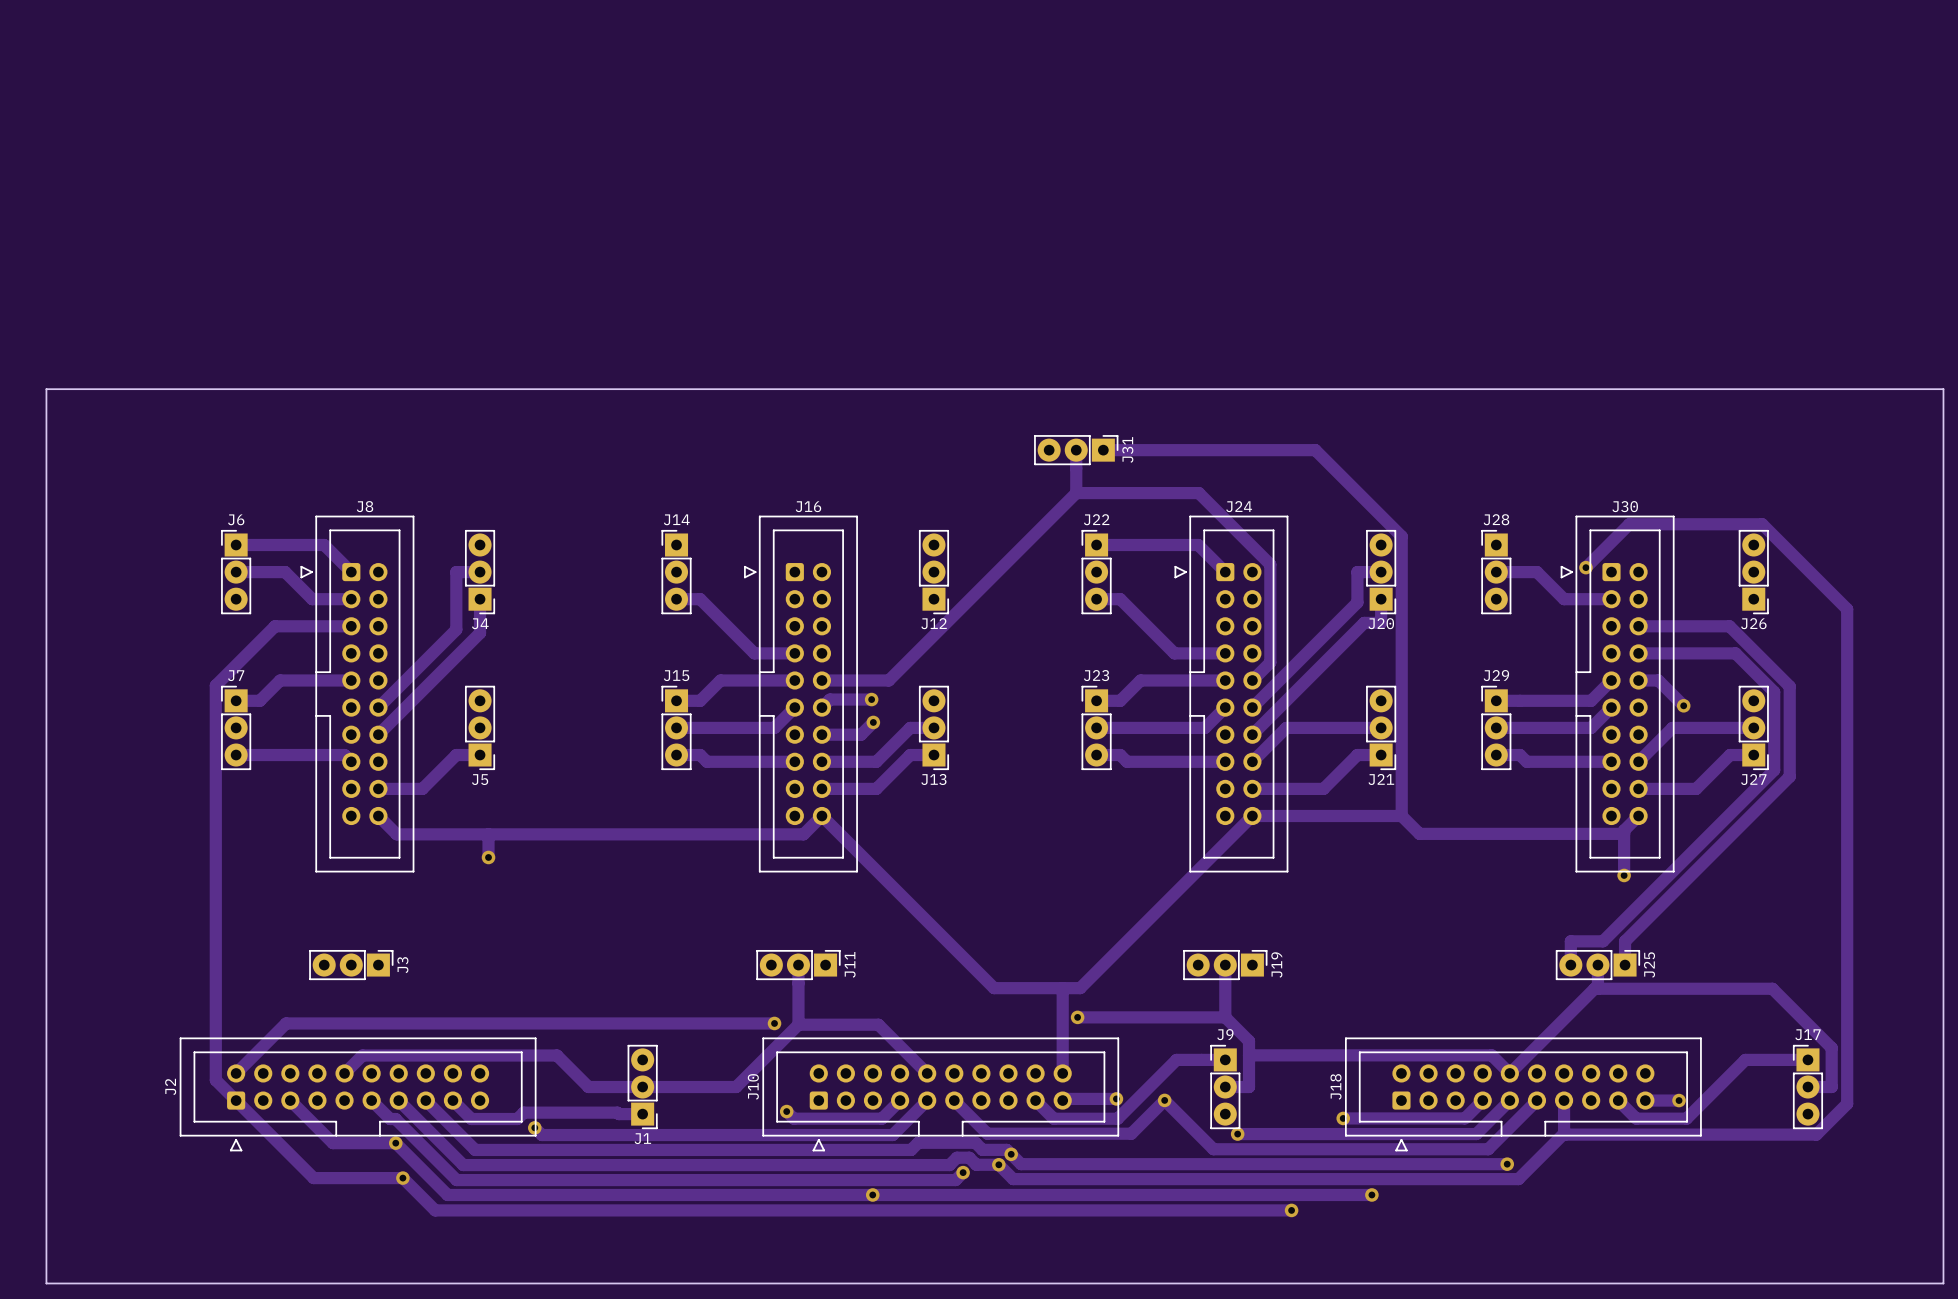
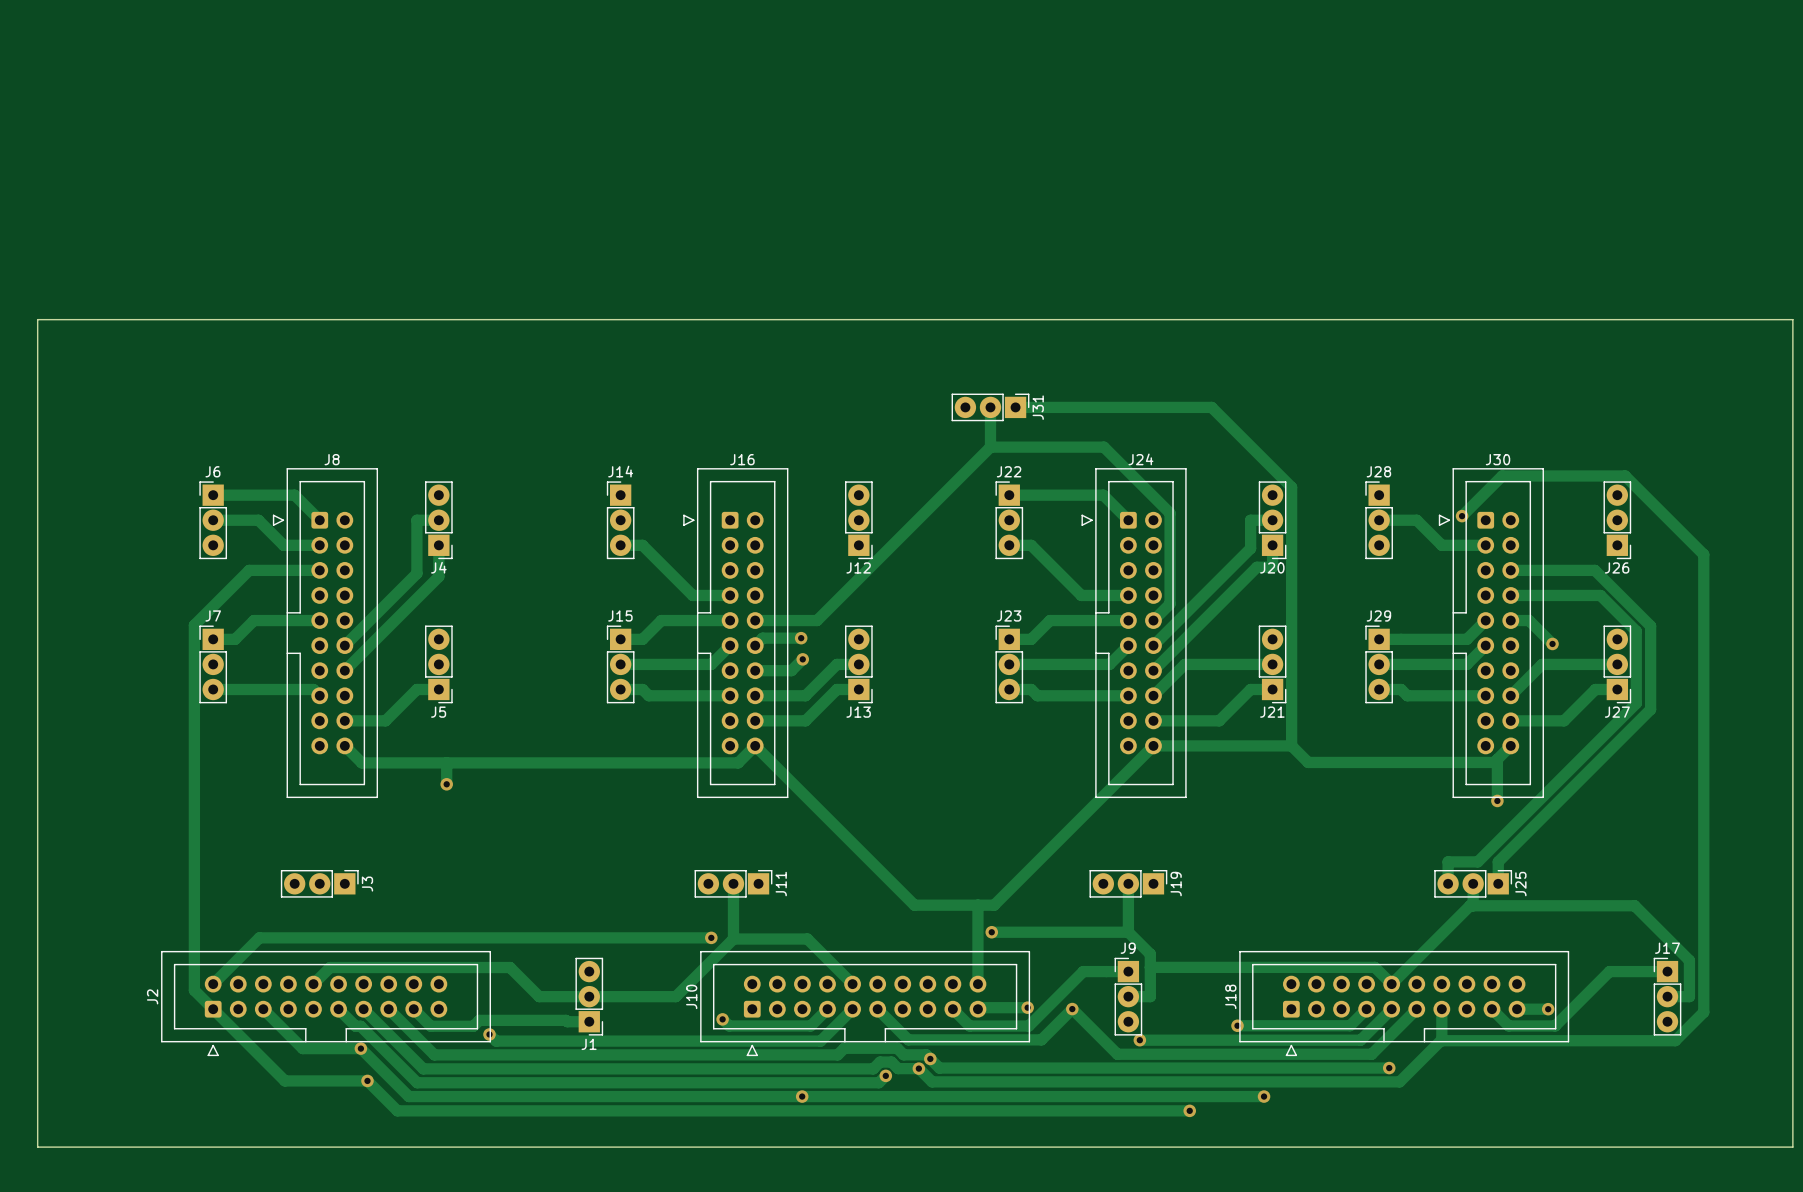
board edge: (46, 389) (1943, 389) -> (37, 350) (37, 319) (1792, 319) (1792, 350)
board edge: (46, 1249) (46, 1283) (1943, 1283) (1943, 1249) -> (37, 1147) (1792, 1147)

